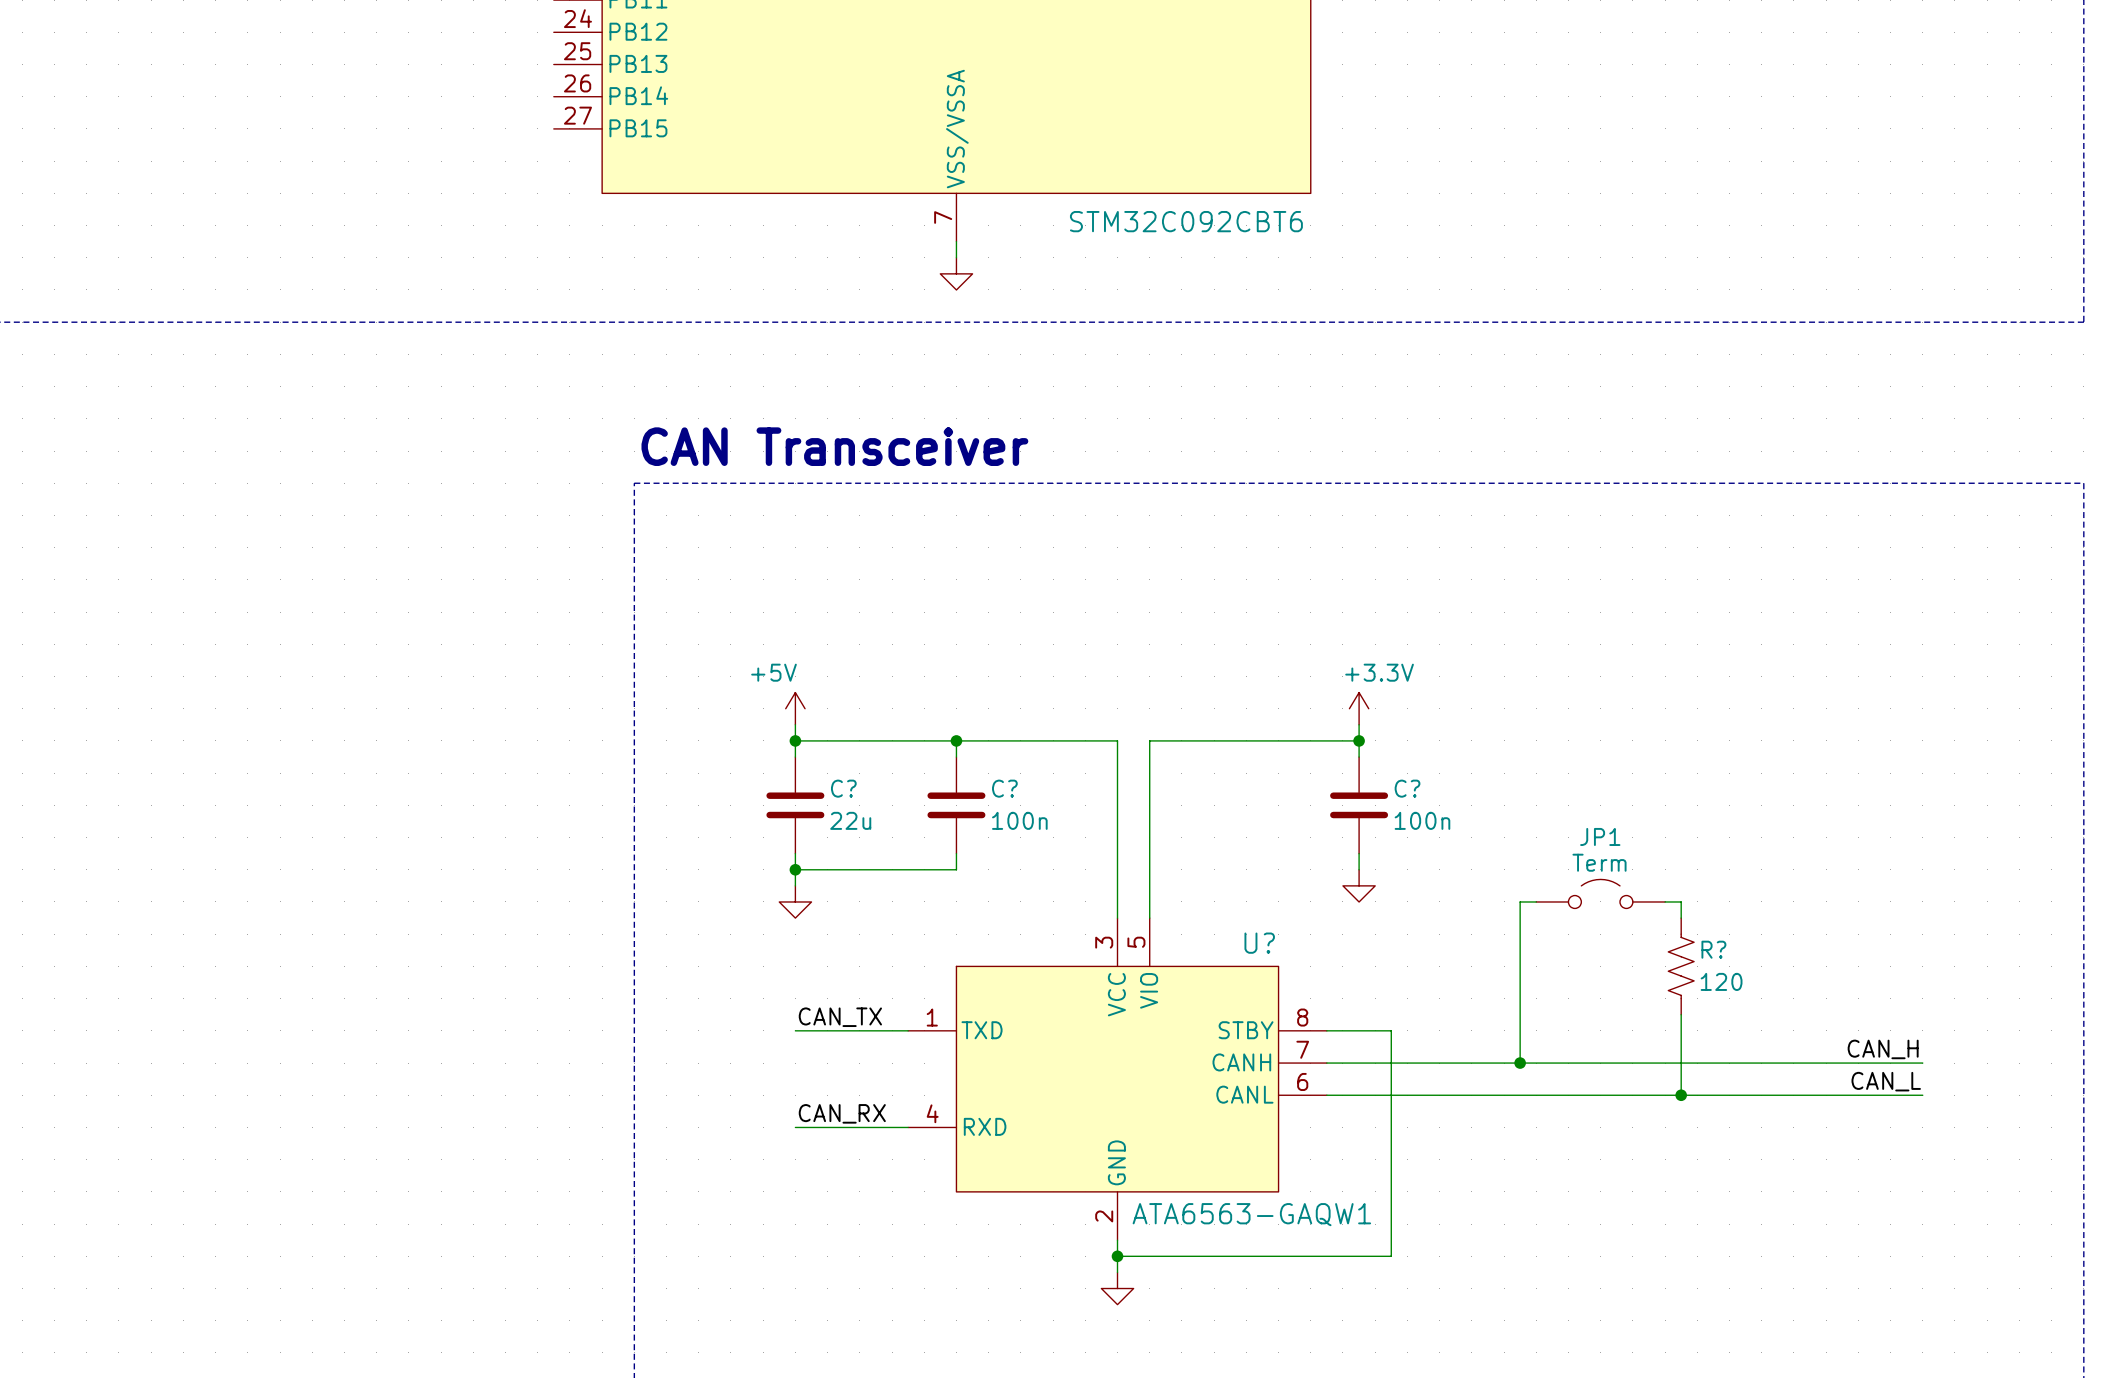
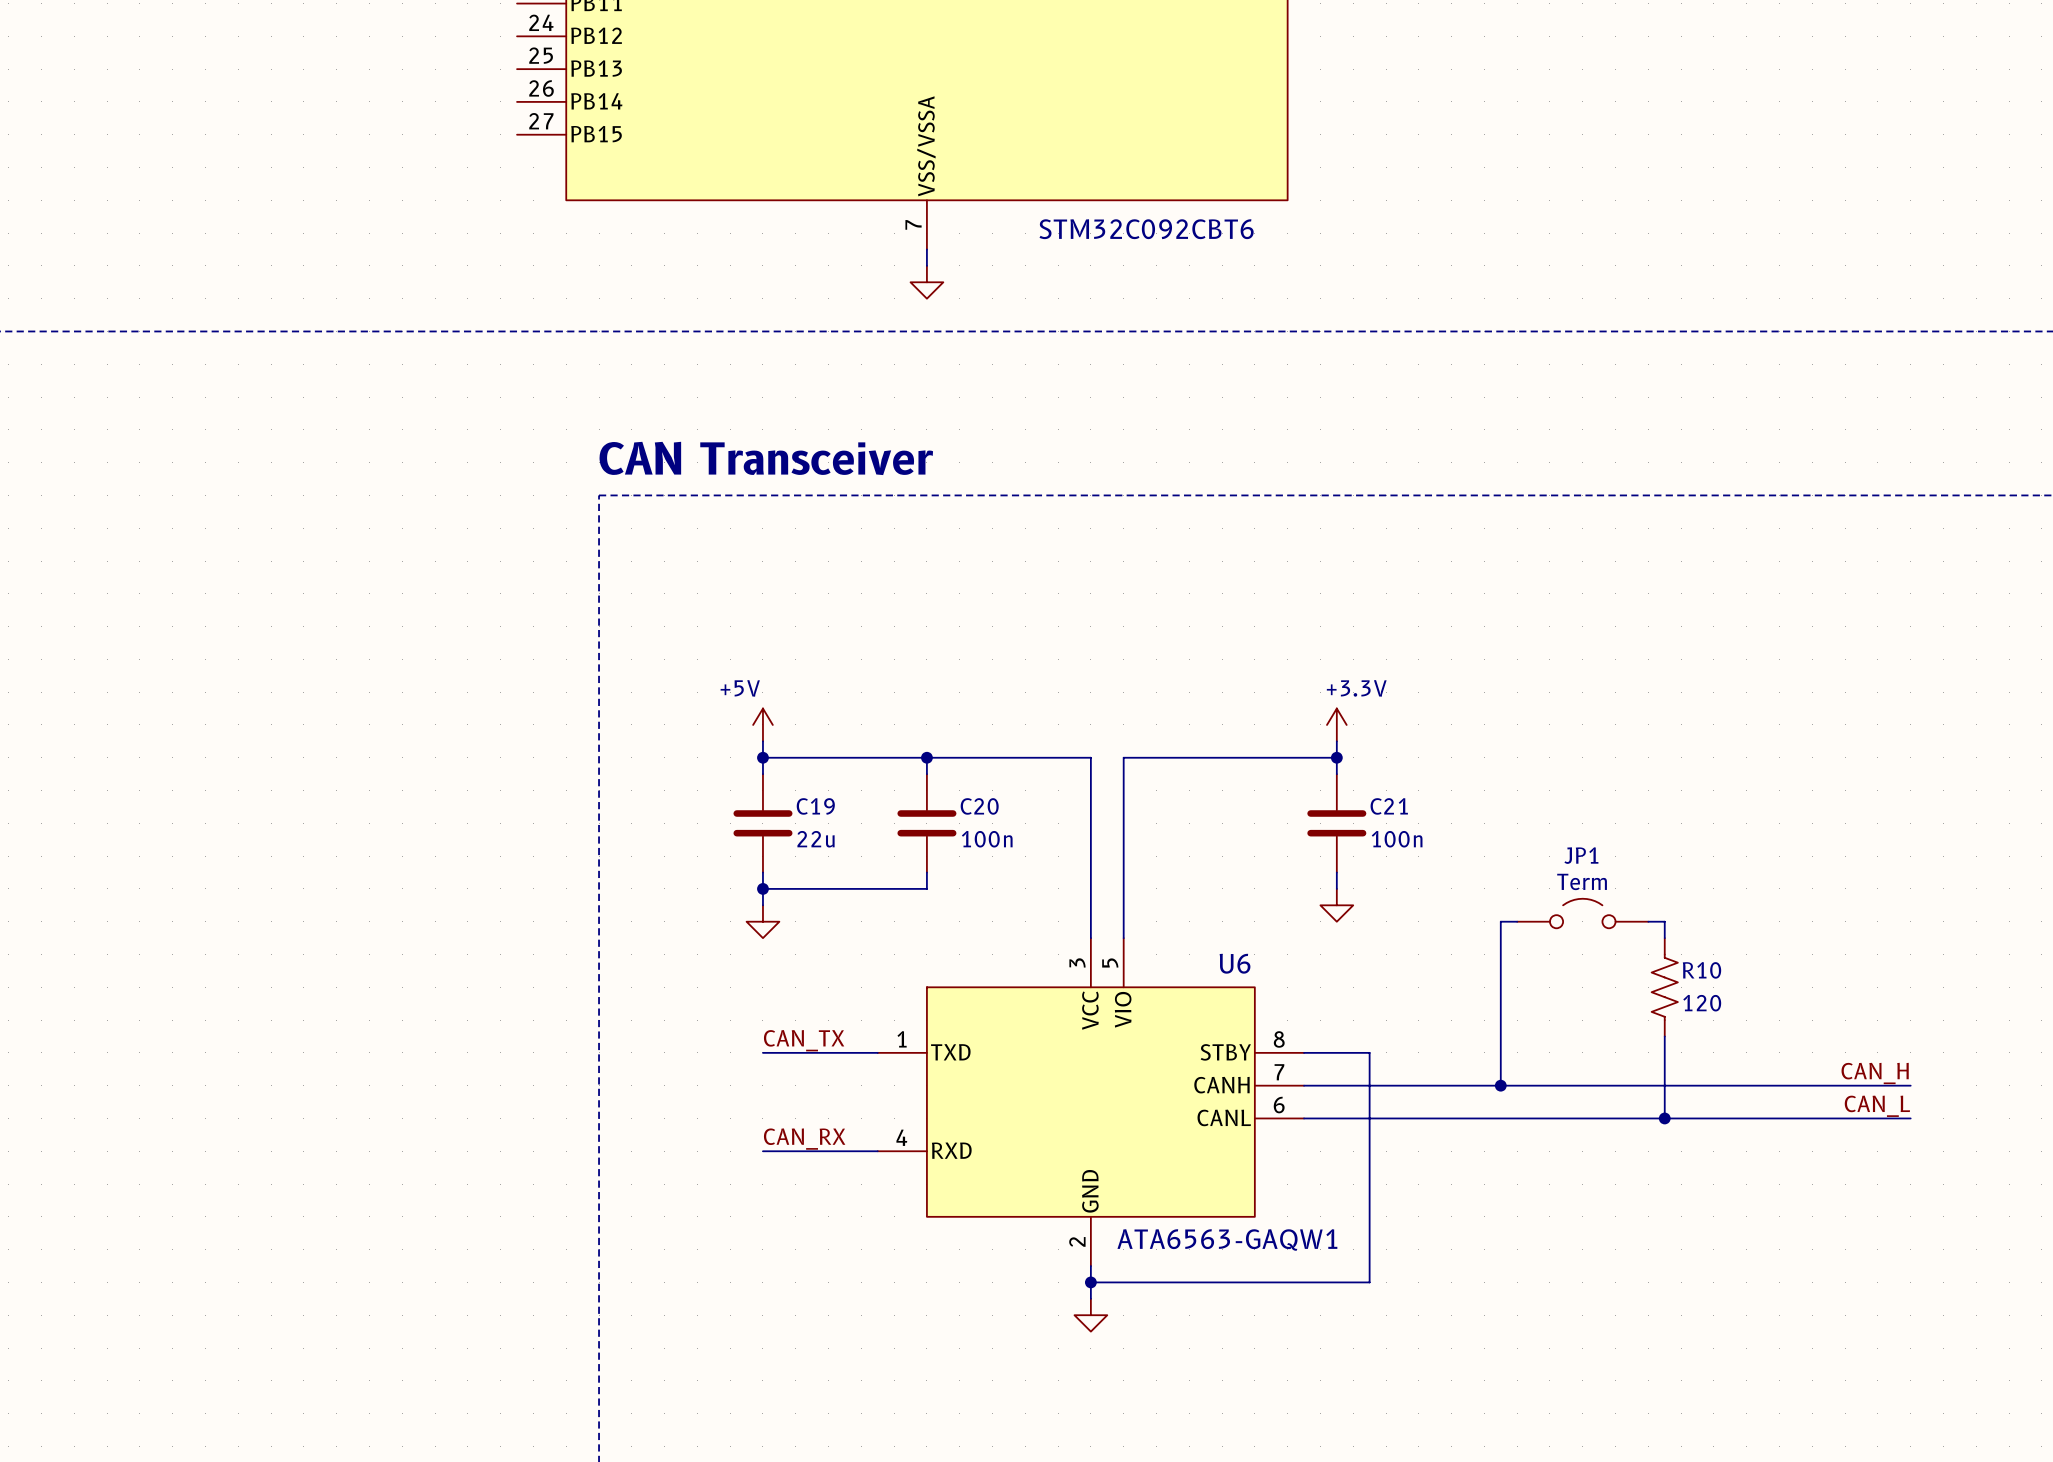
C? name: C? (843, 788) -> C19 (815, 806)
C? name: C? (1004, 788) -> C20 (979, 806)
C? name: C? (1407, 788) -> C21 (1389, 806)
U? name: U? (1259, 943) -> U6 (1235, 963)
R? name: R? (1713, 949) -> R10 (1701, 970)

